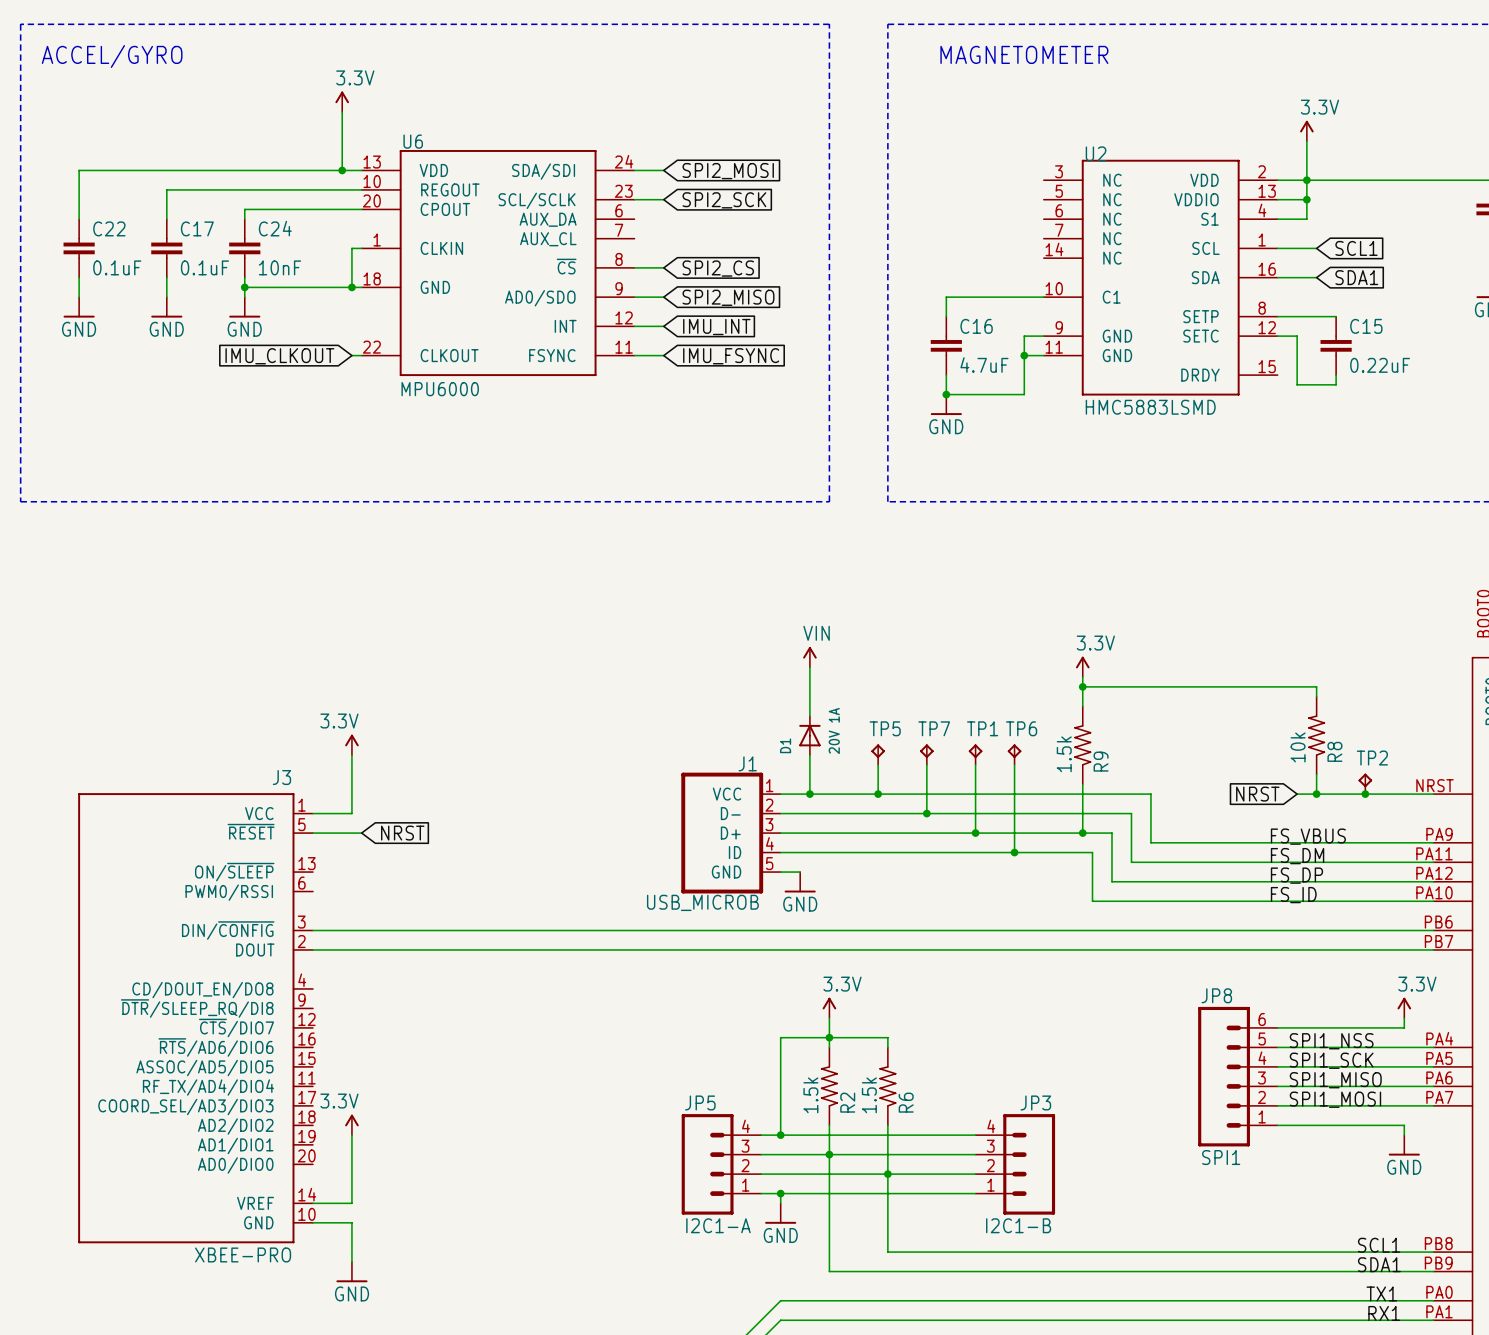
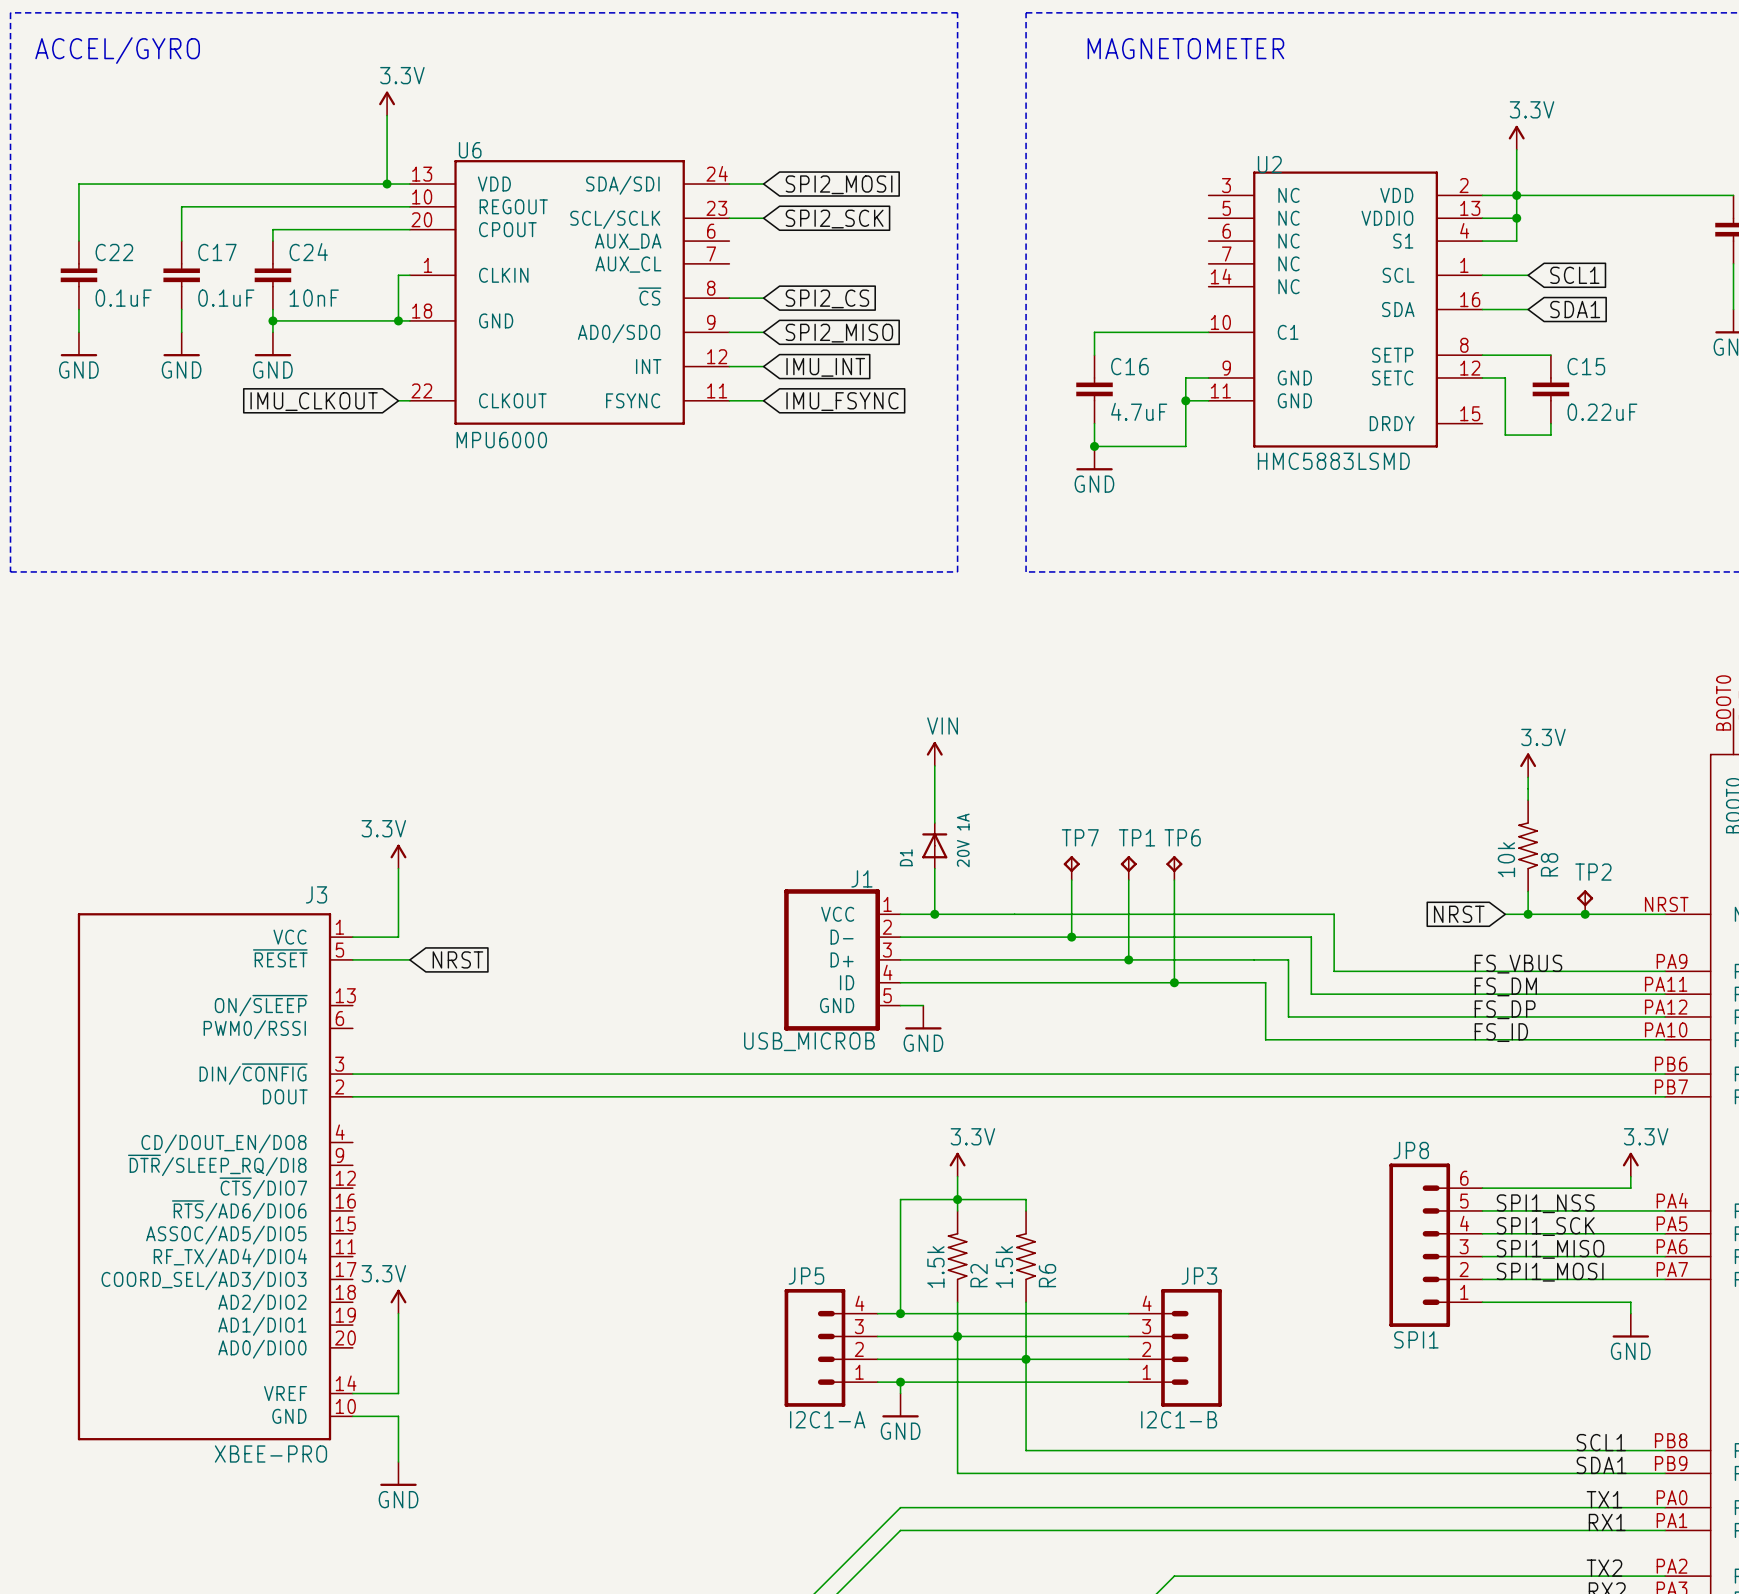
power symbol: 3.3V (1082, 666) -> none
power symbol: none -> 3.3V (1528, 765)
wire: (1082, 677) (1082, 706) -> none
wire: (1082, 686) (1316, 686) -> (1528, 777) (1528, 788)
junction: (1082, 686) -> none
R9: 1.5k (1082, 745) -> none
TP5: (878, 754) -> none
wire: (878, 764) (878, 794) -> none
wire: (1082, 784) (1082, 833) -> none
junction: (878, 794) -> none
junction: (1082, 833) -> none

